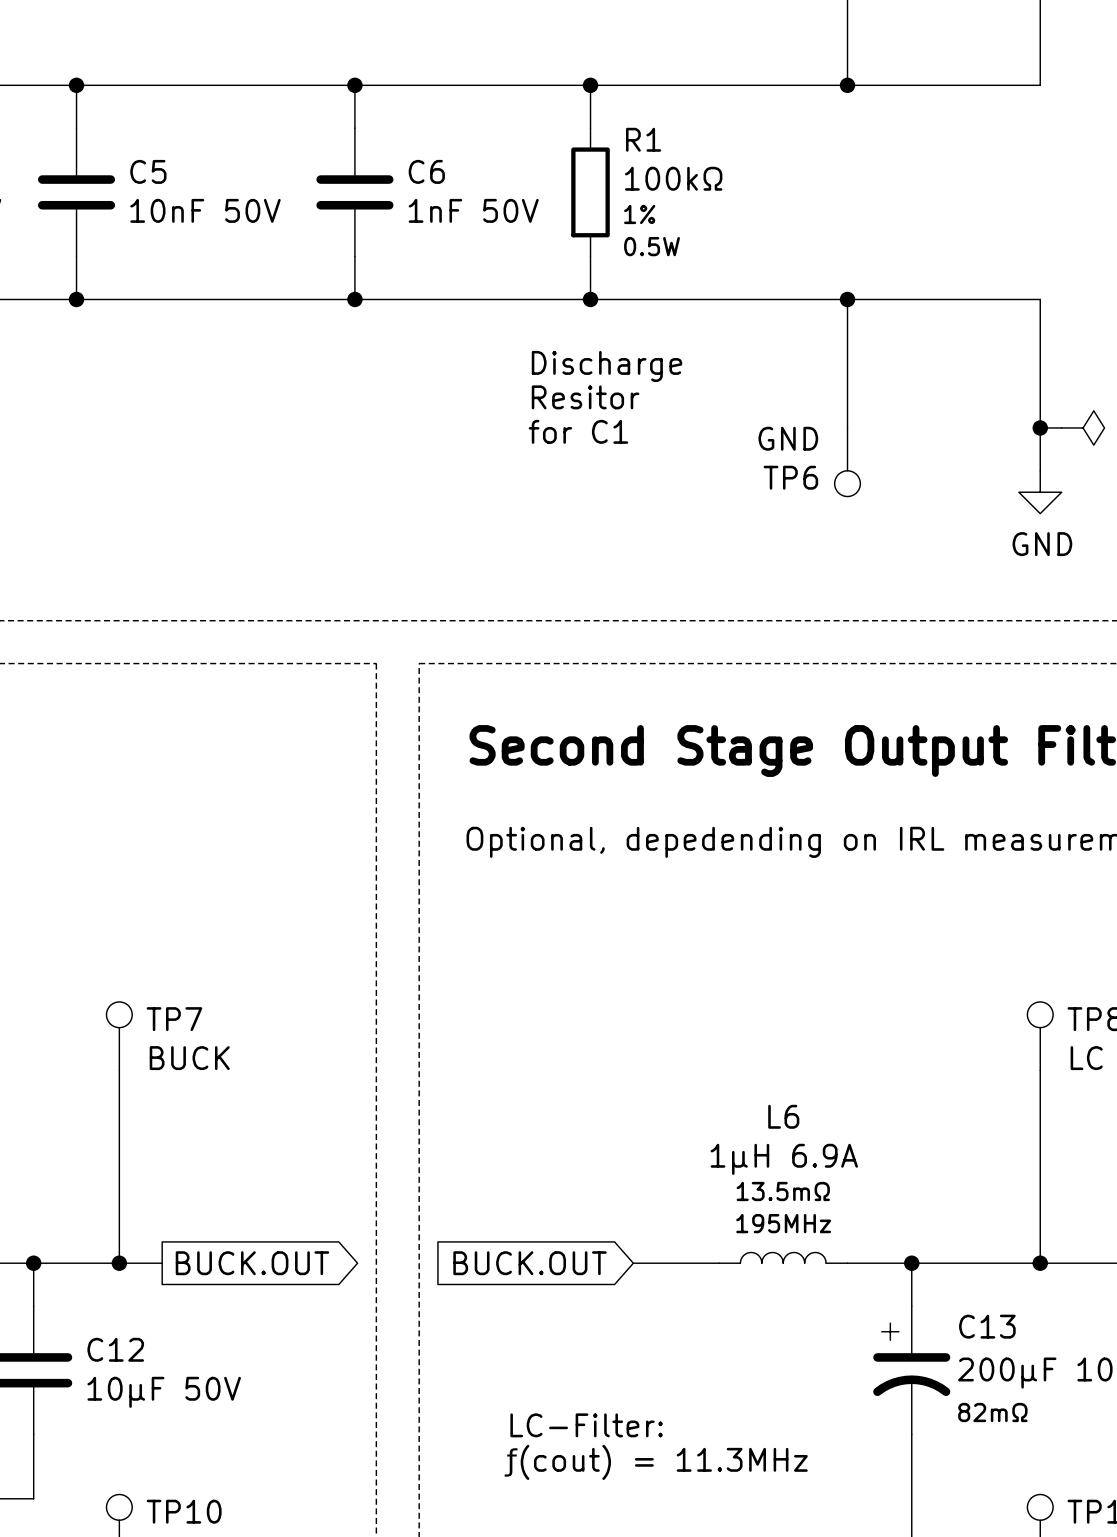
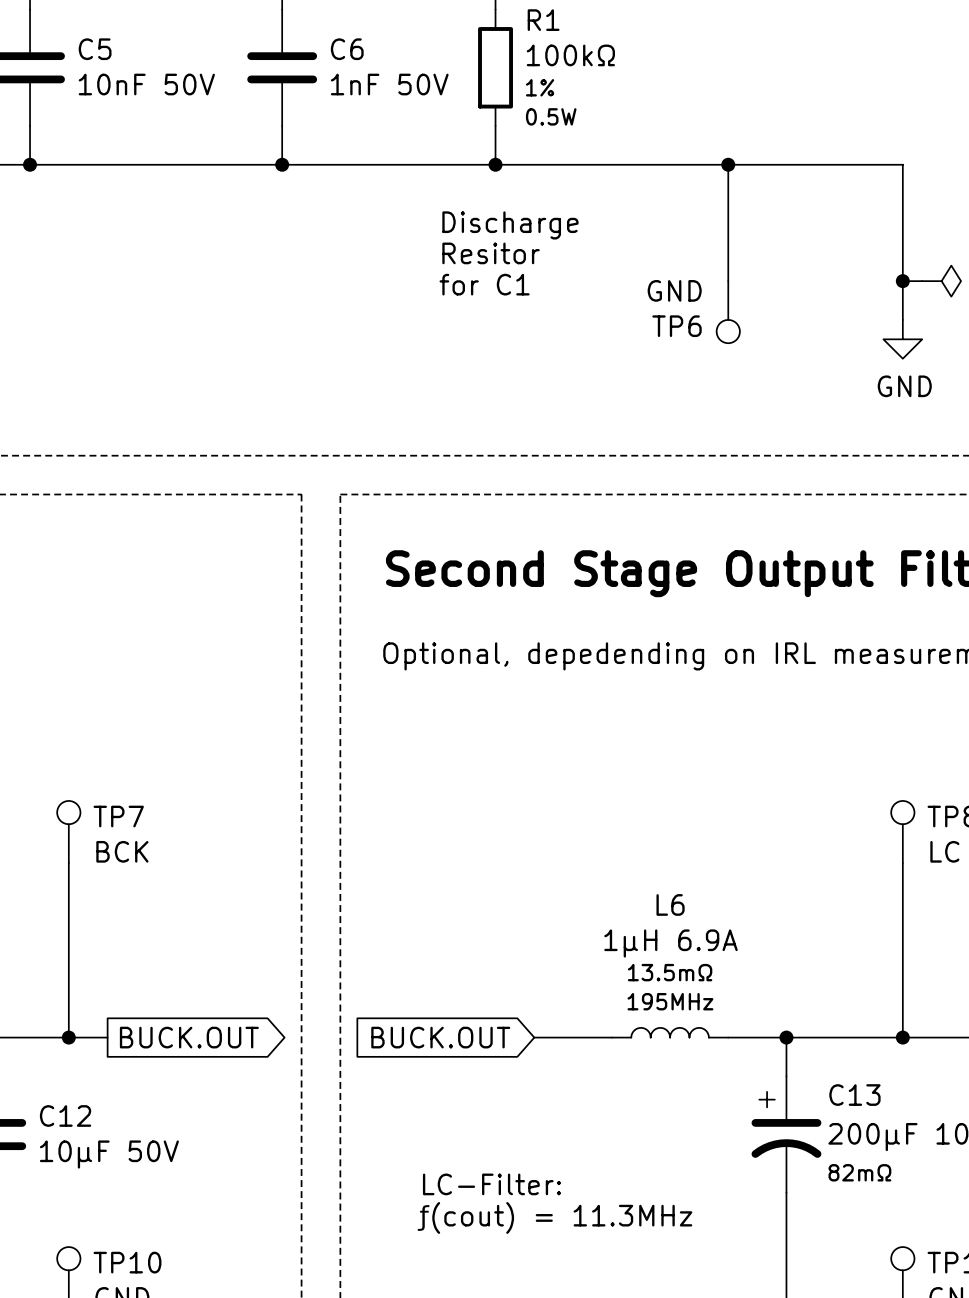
TP7 value: BUCK (189, 1058) -> BCK (122, 851)

